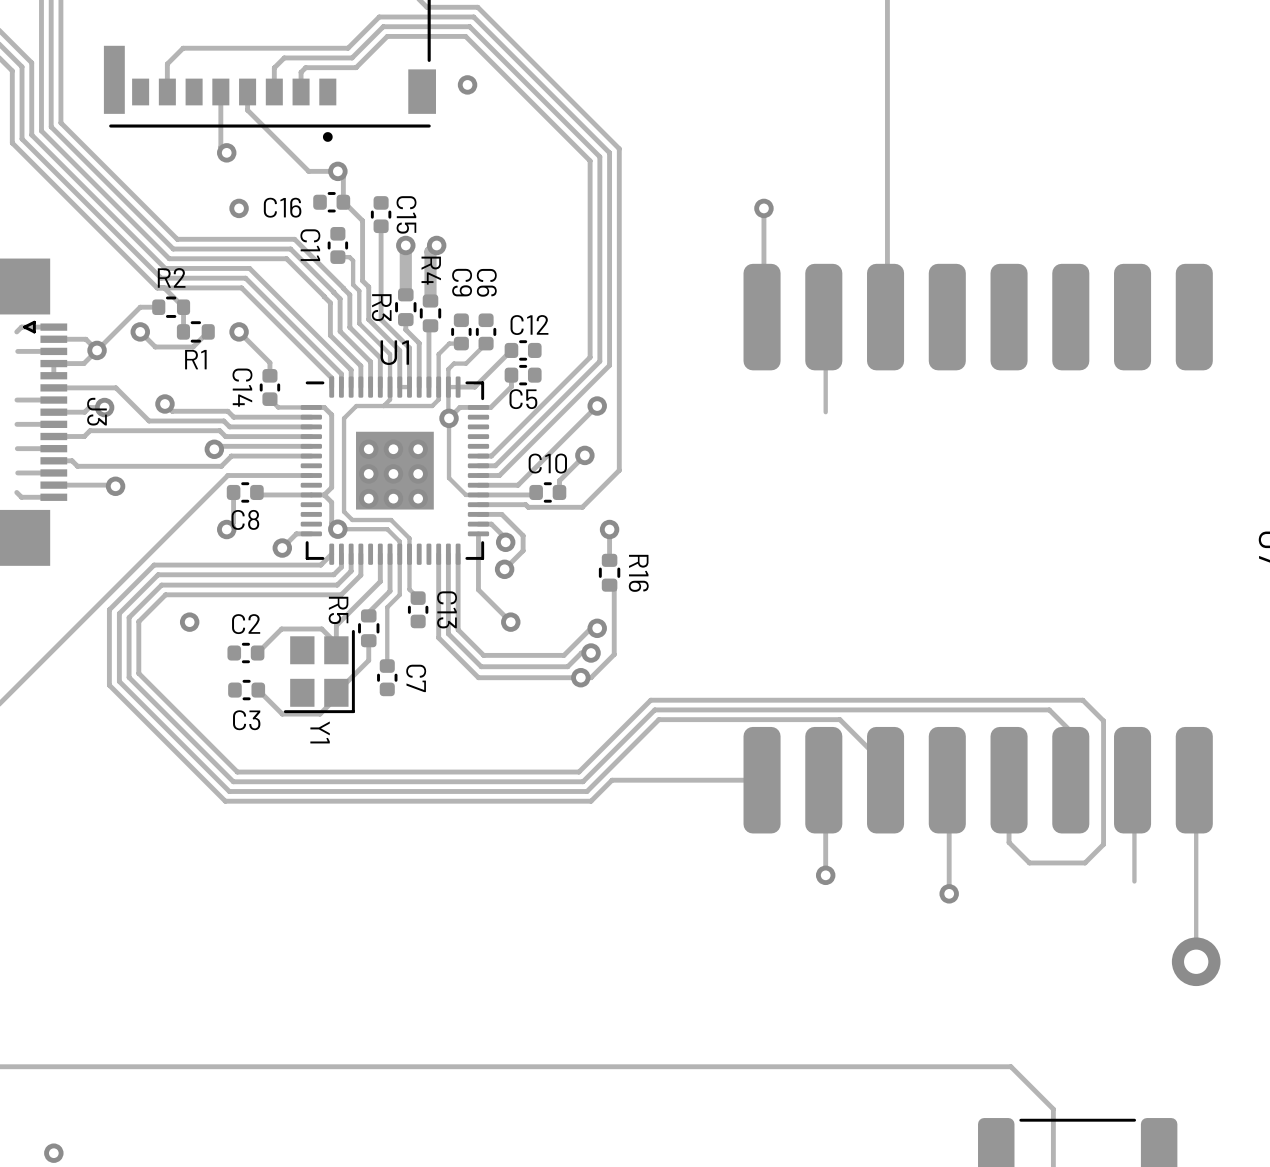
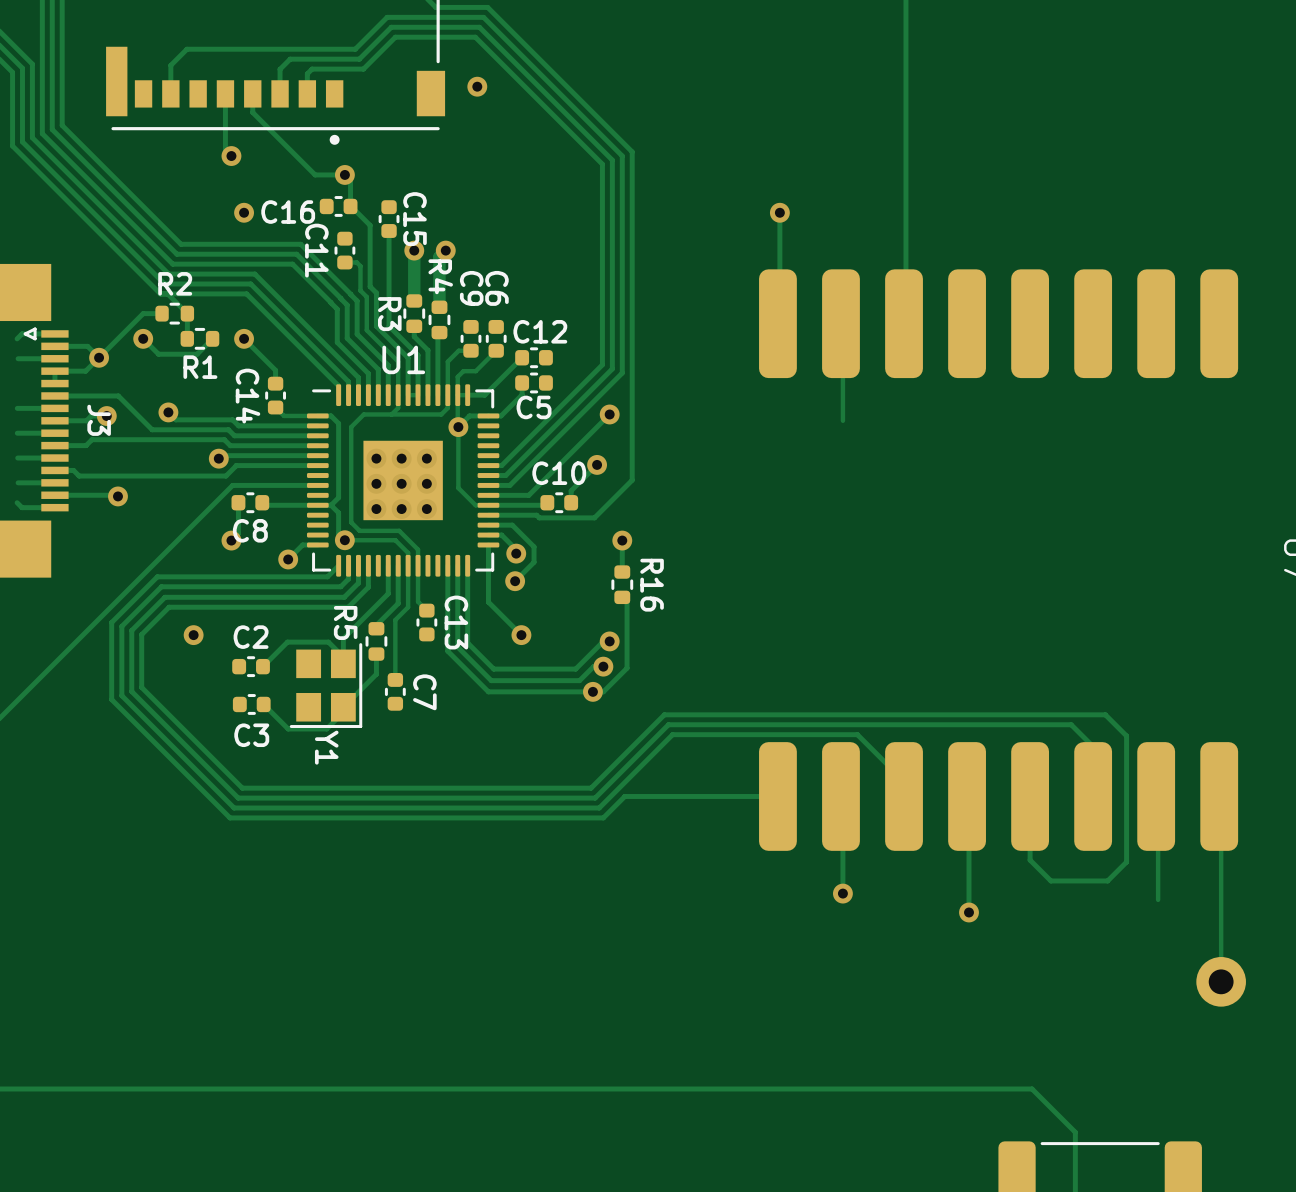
via: (53, 1153) -> none

